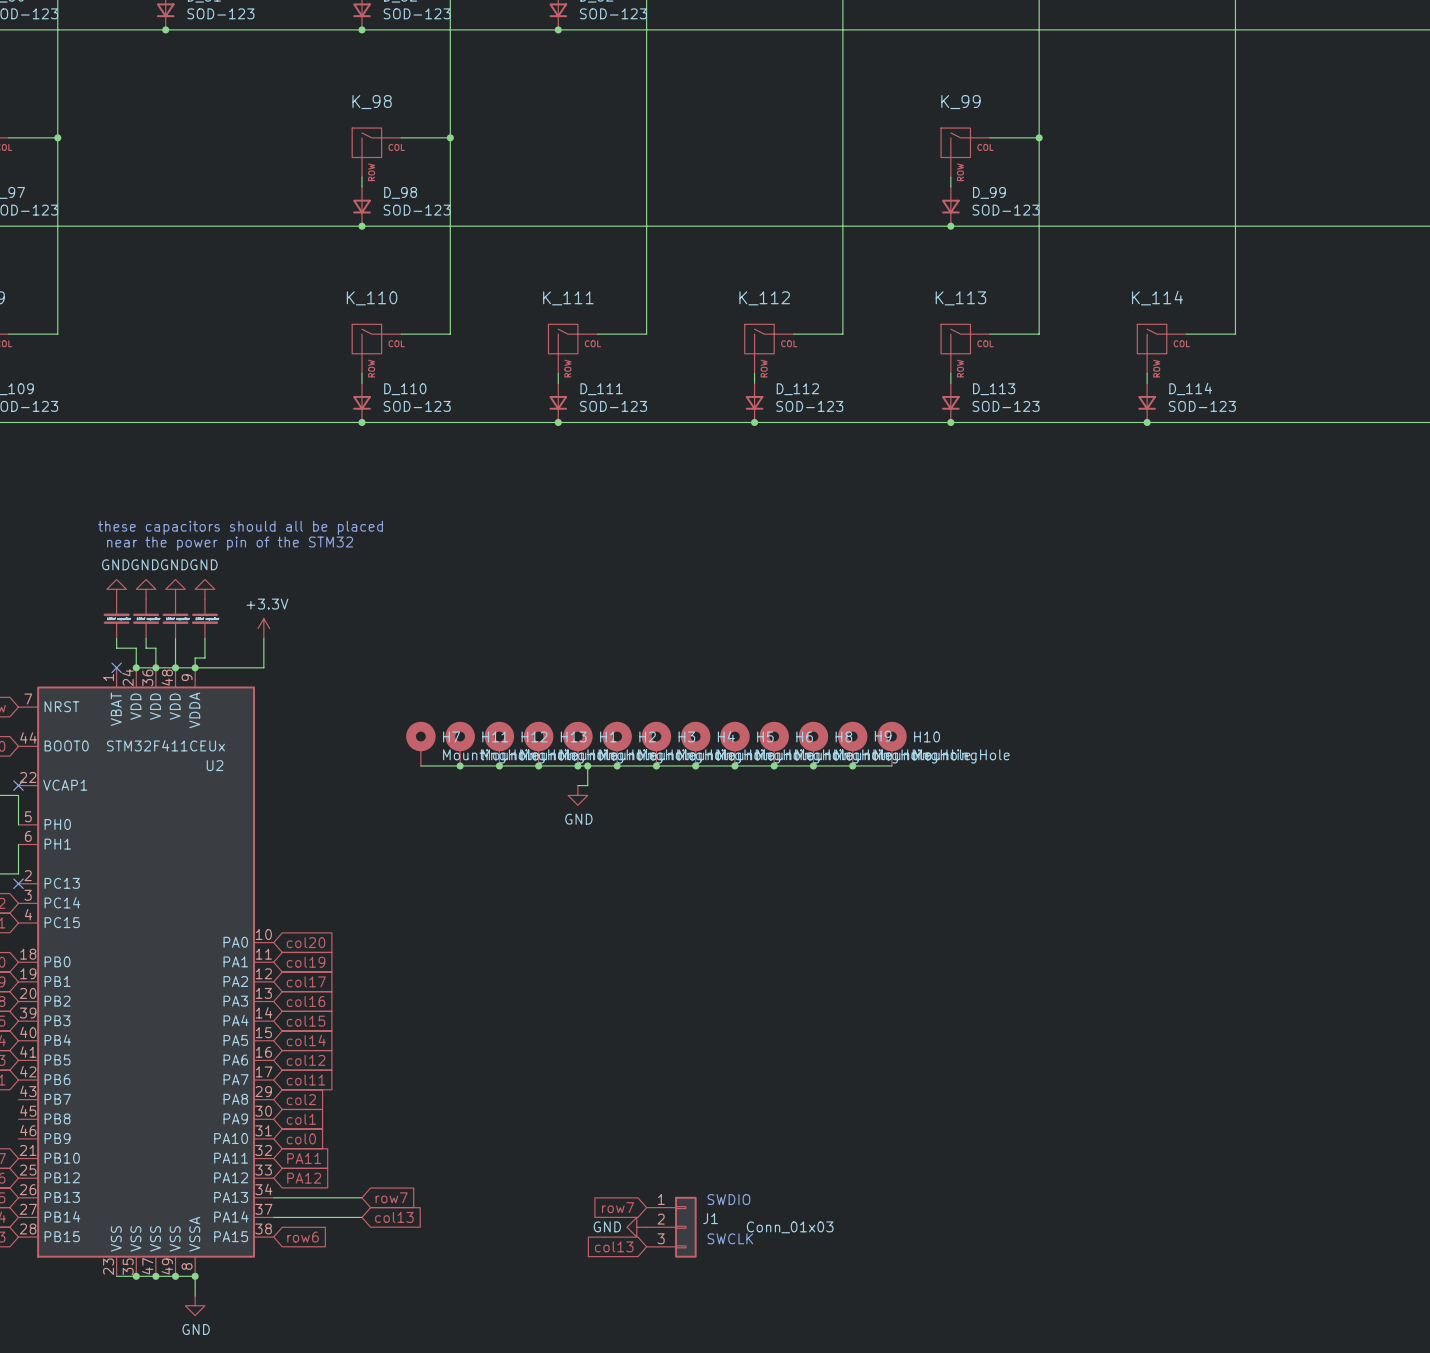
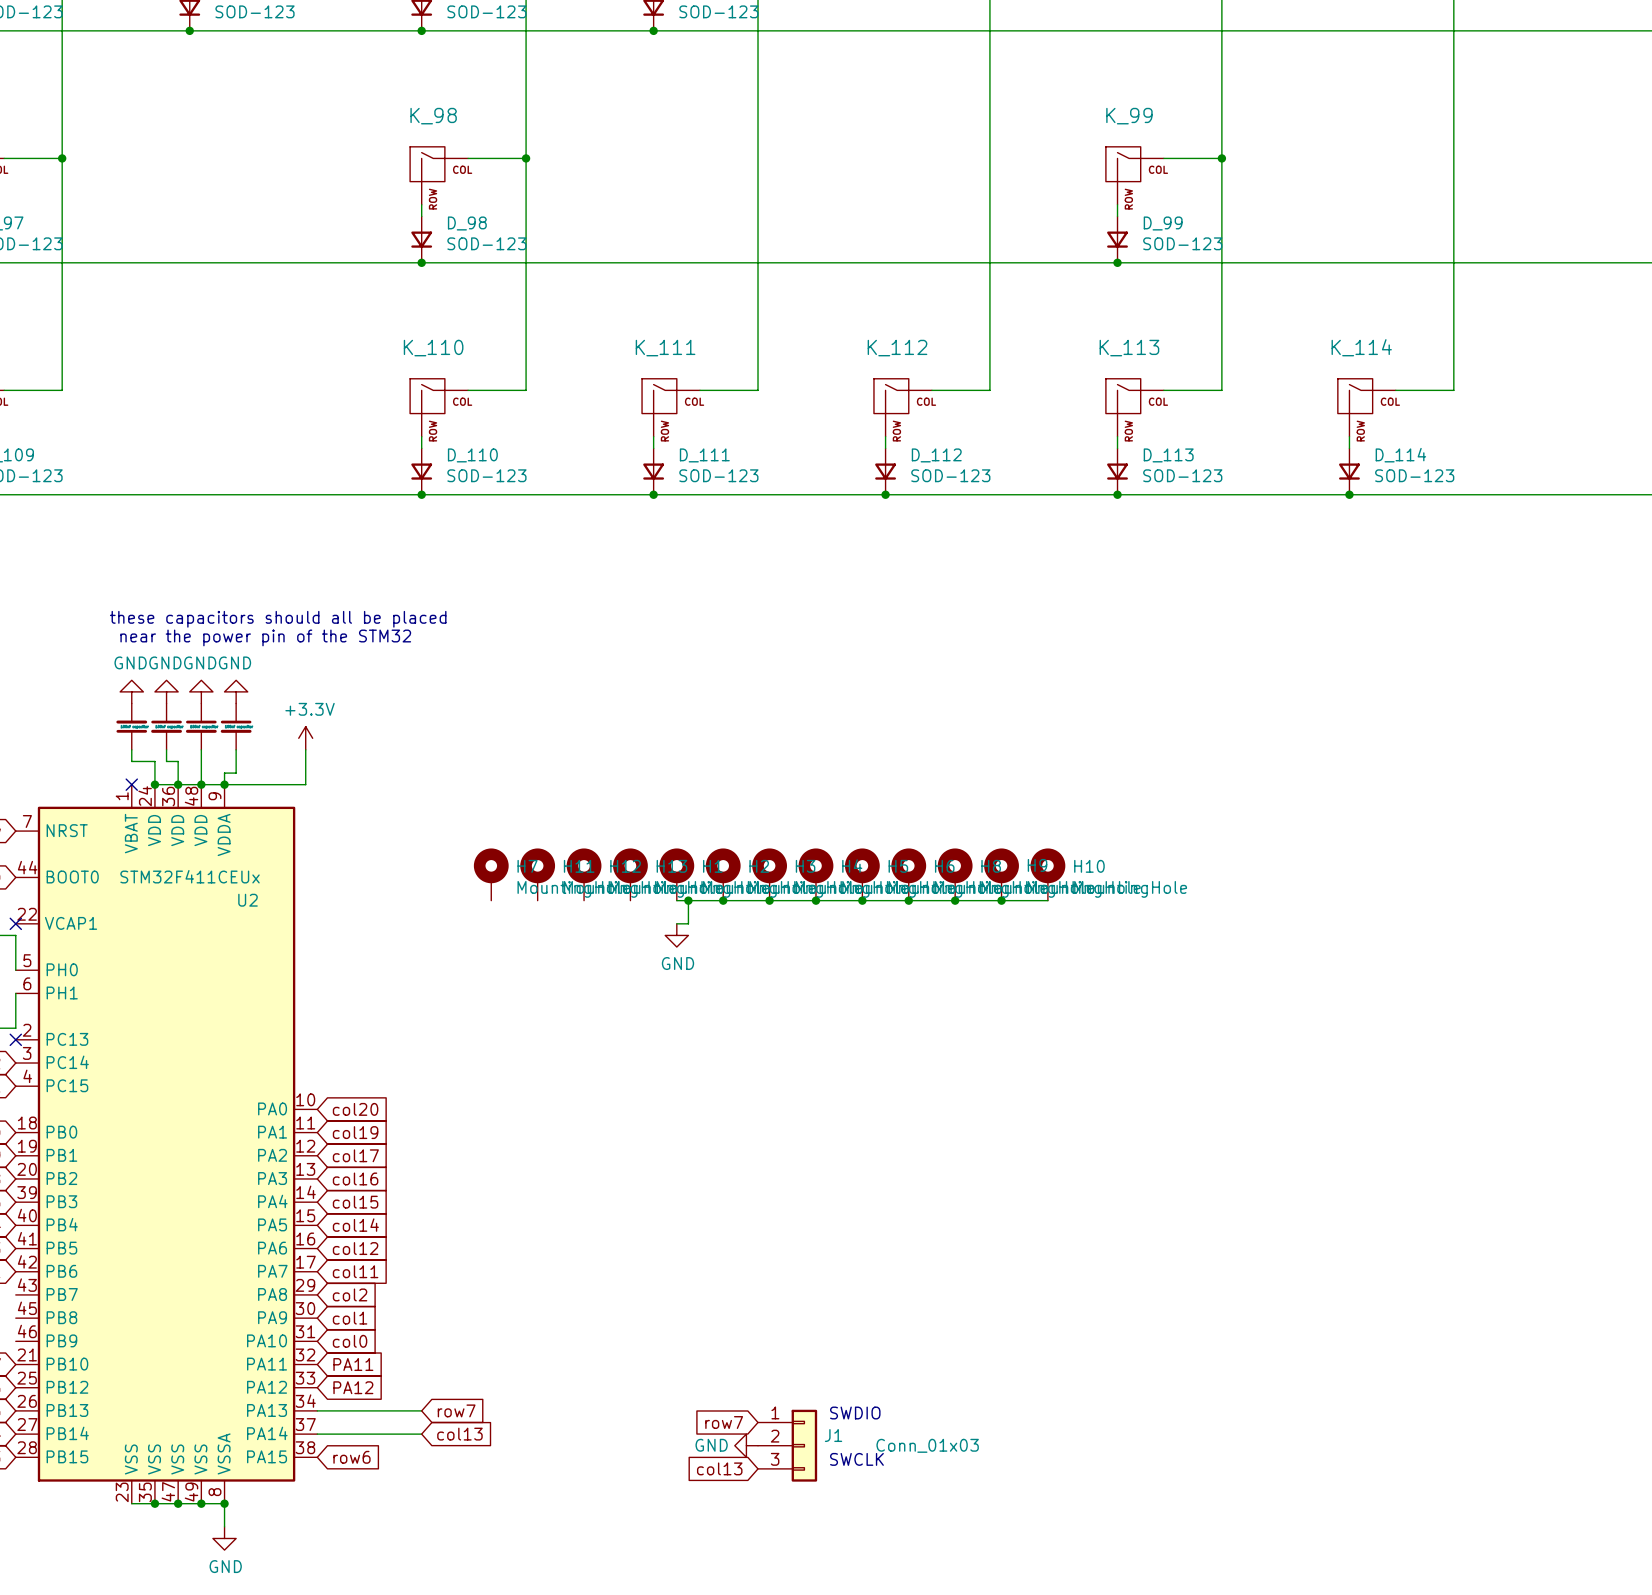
wire: (420, 765) (577, 765) -> none
junction: (460, 765) -> none
junction: (499, 765) -> none
junction: (538, 765) -> none
junction: (577, 765) -> none

